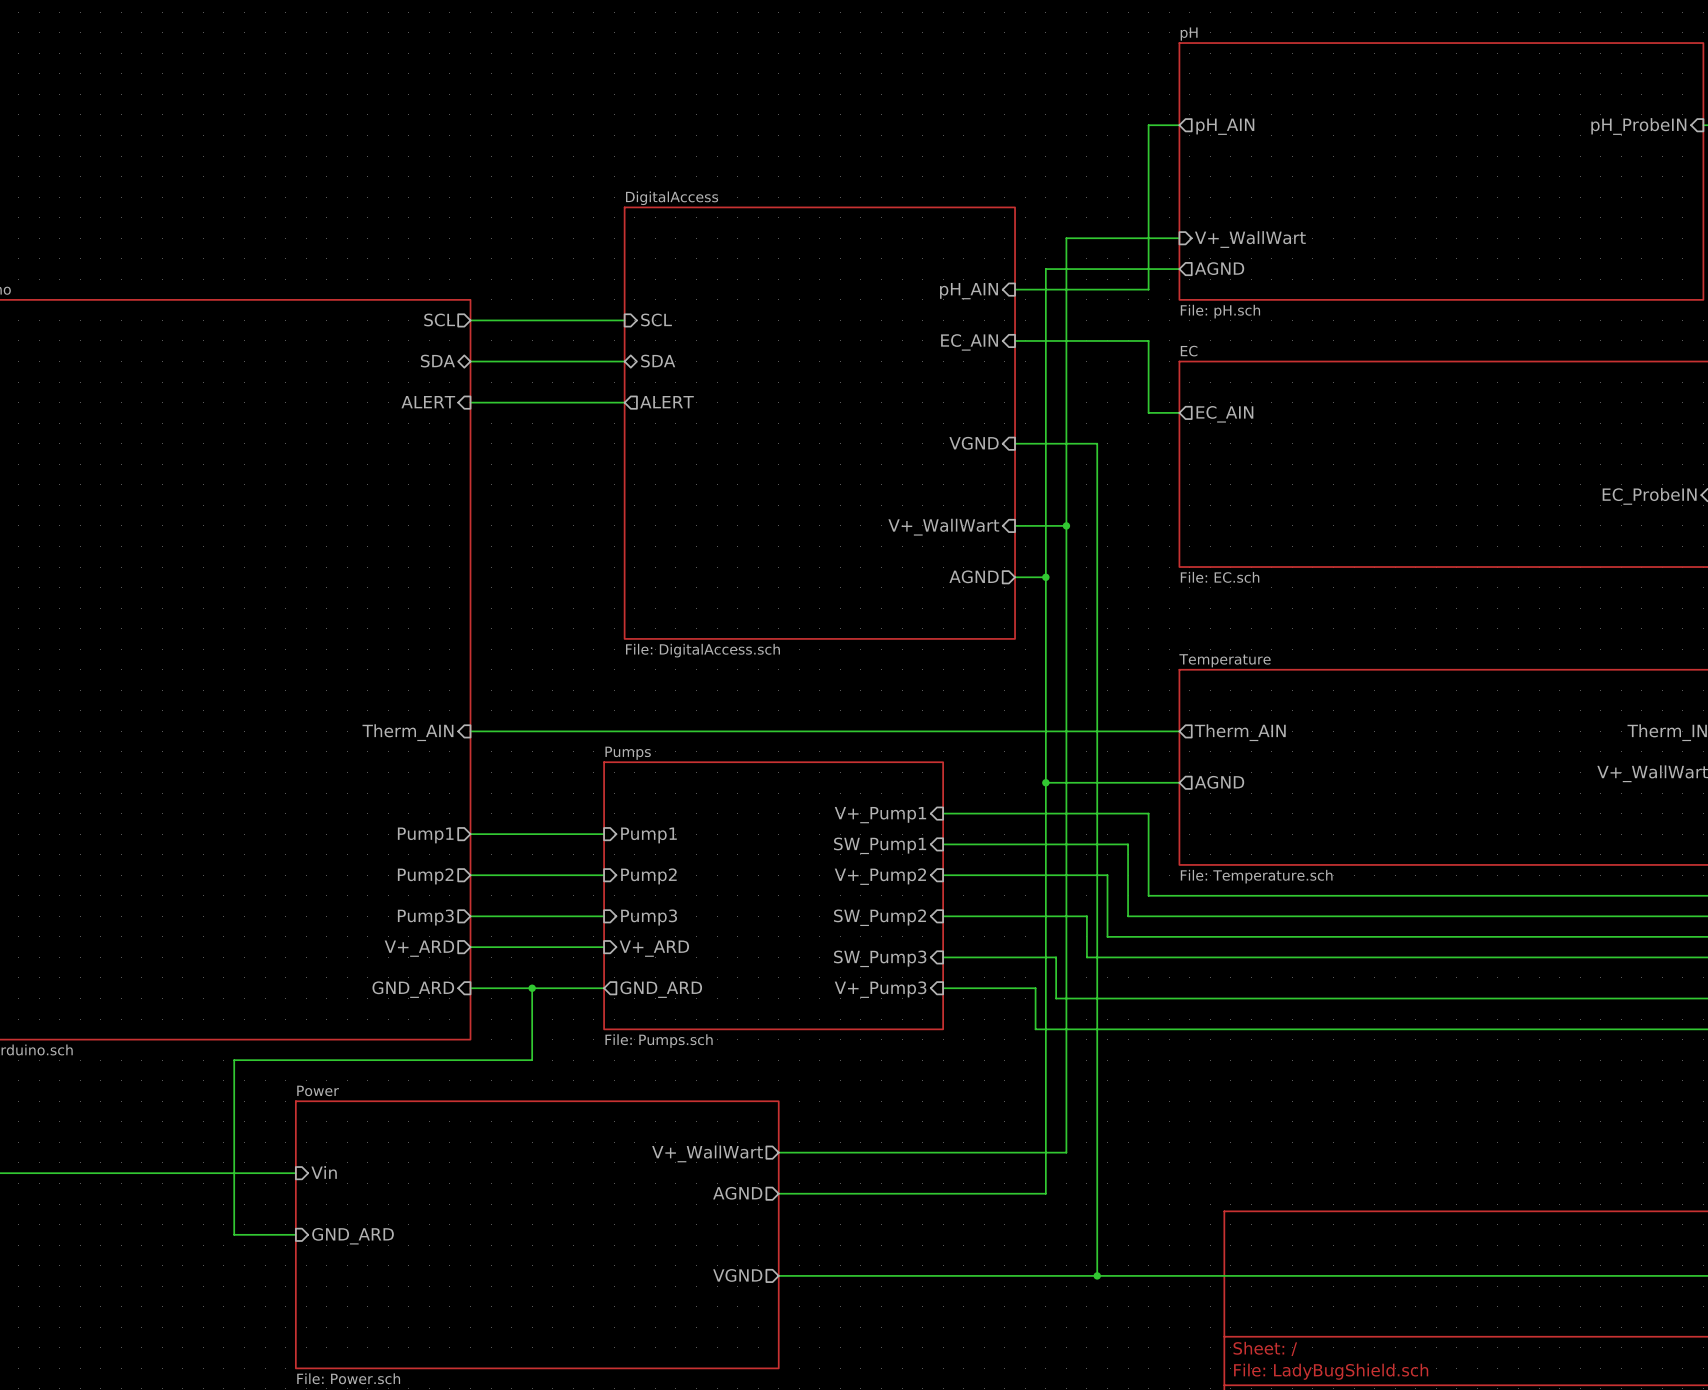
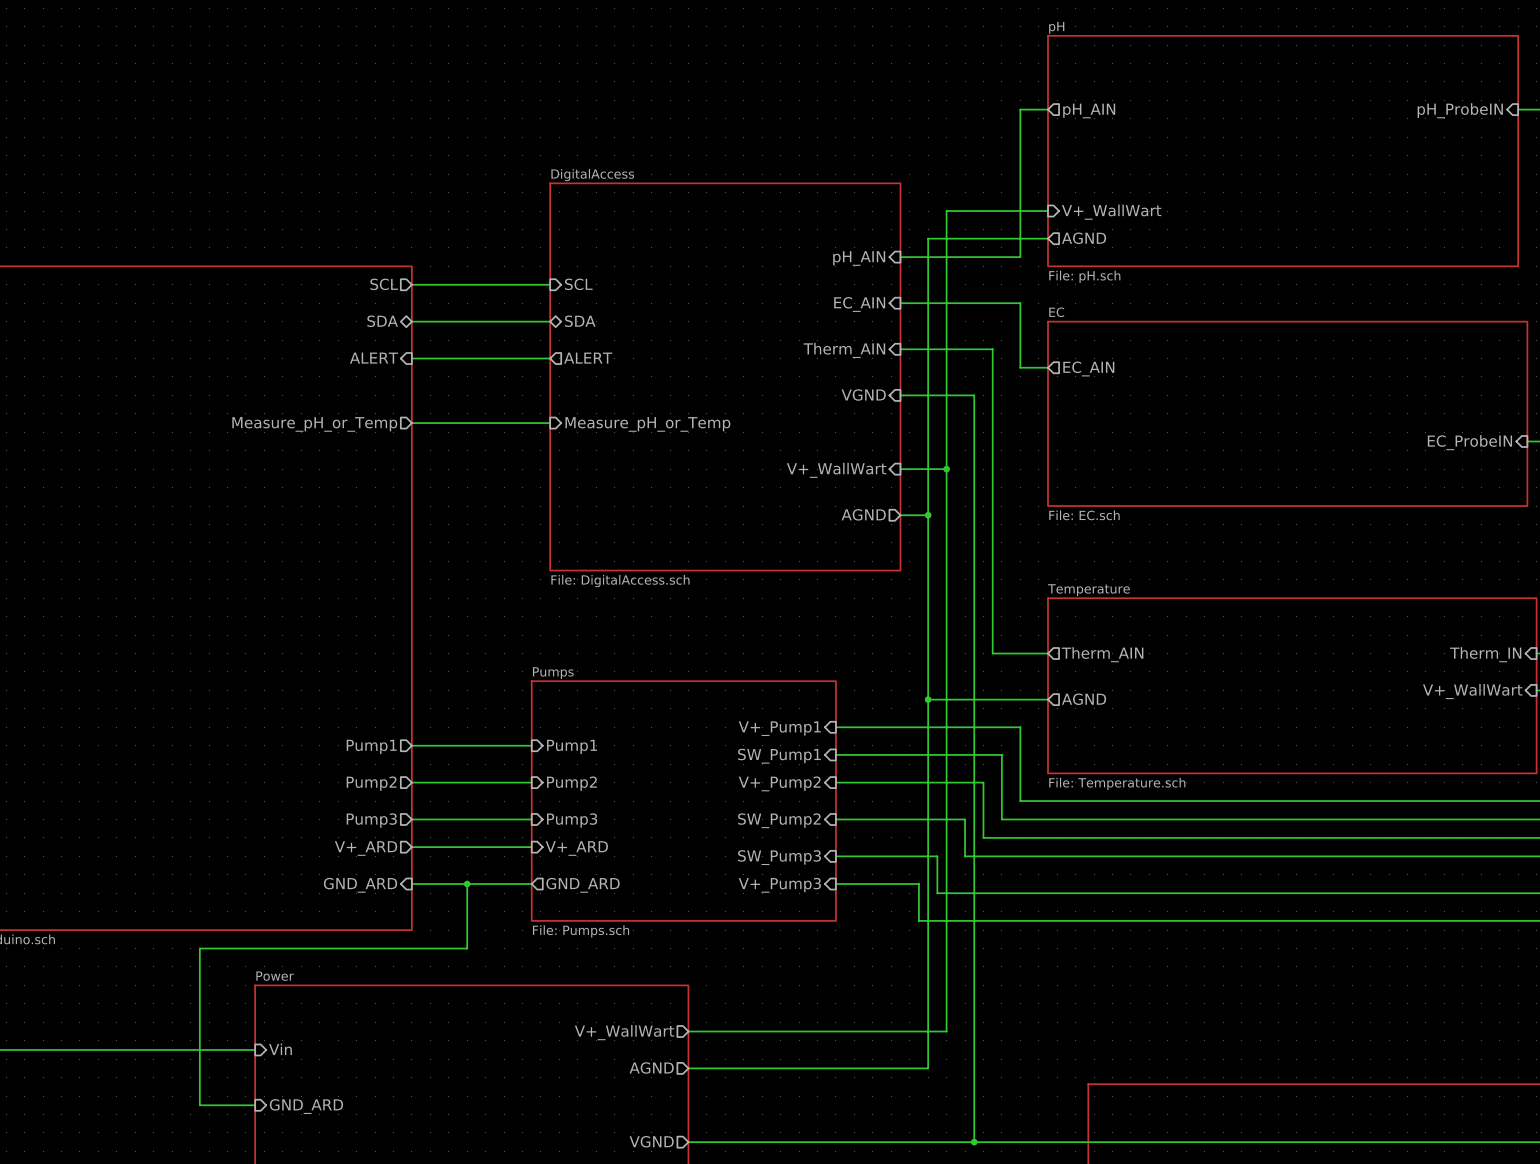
sheet pin: none -> Therm_AIN (844, 350)
wire: none -> (411, 423) (550, 423)
sheet pin: none -> Measure_pH_or_Temp (314, 424)
sheet pin: none -> Measure_pH_or_Temp (647, 424)
wire: (470, 731) (1117, 731) -> (900, 349) (992, 349) (992, 653)
sheet pin: Therm_AIN (407, 732) -> none

